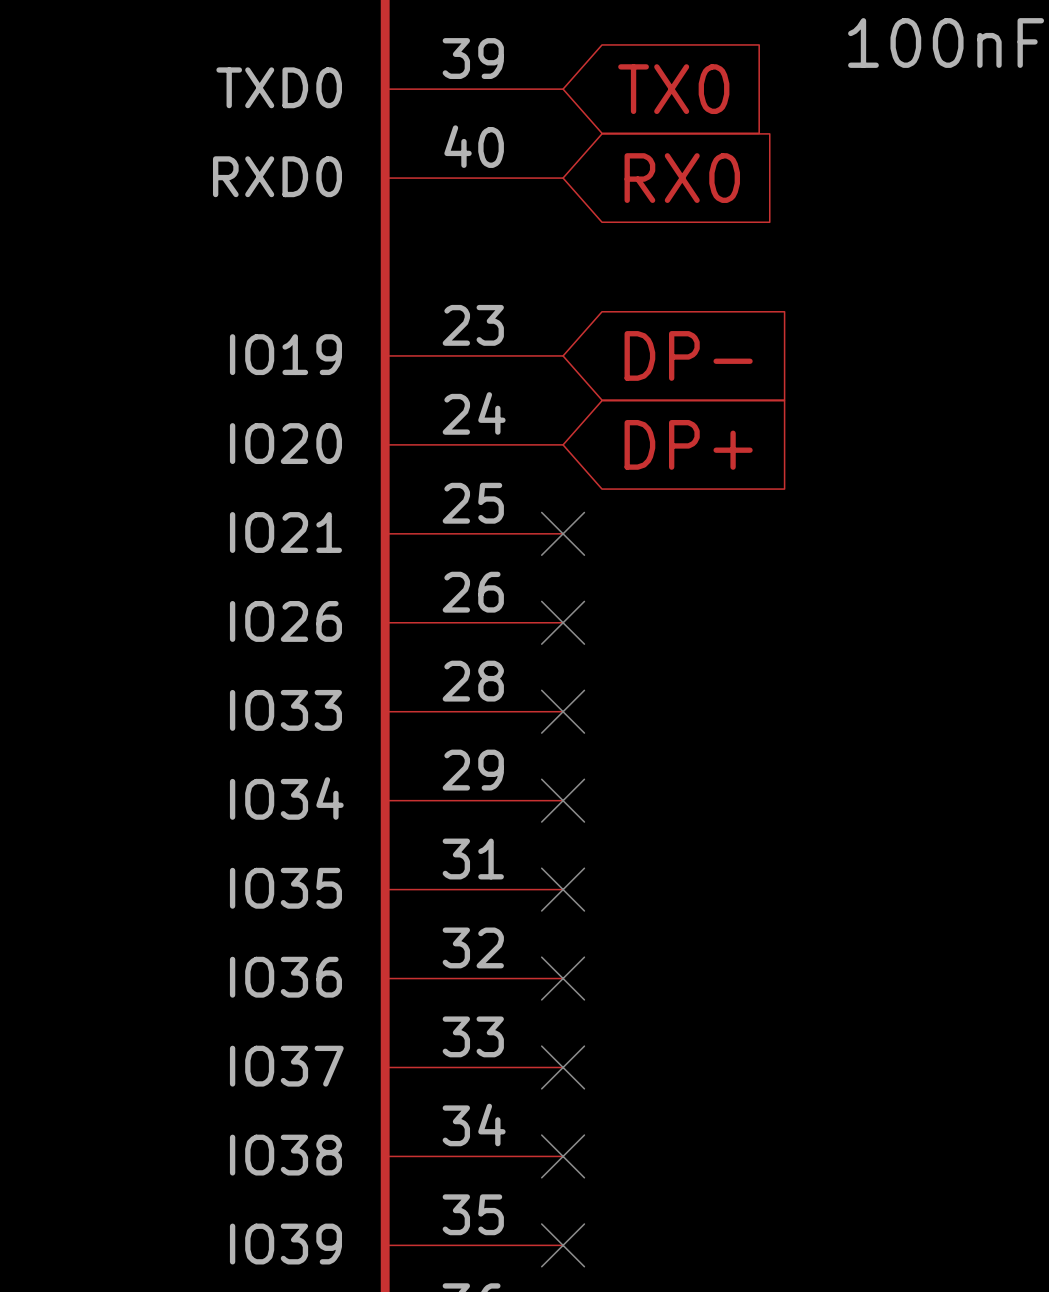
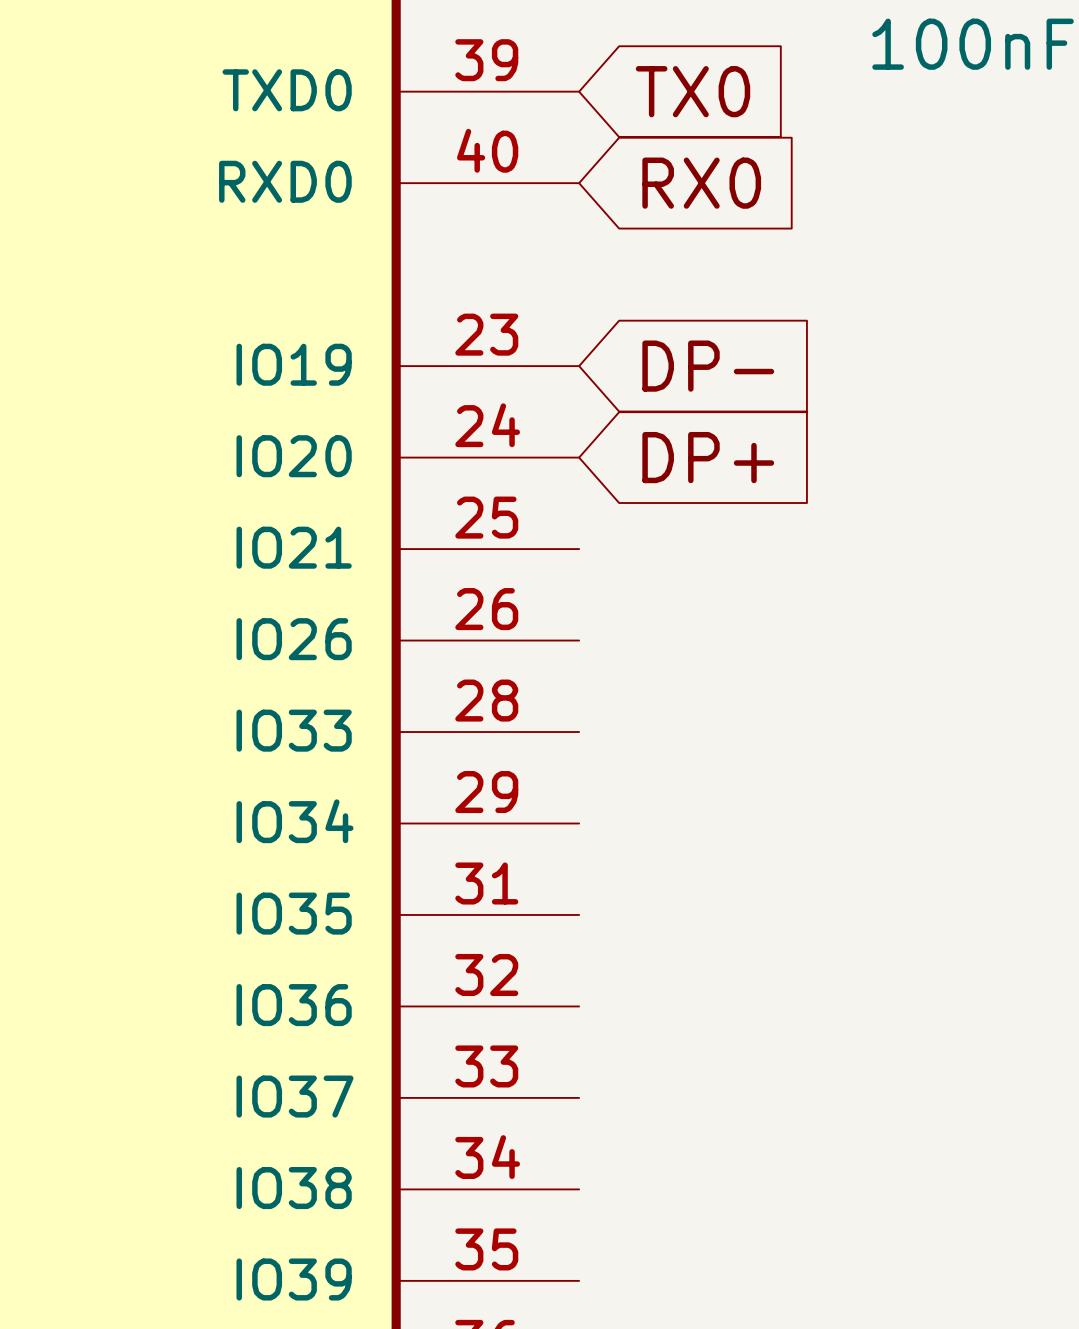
no-connect mark: (563, 533) -> none
no-connect mark: (563, 622) -> none
no-connect mark: (563, 711) -> none
no-connect mark: (563, 800) -> none
no-connect mark: (563, 889) -> none
no-connect mark: (563, 978) -> none
no-connect mark: (563, 1067) -> none
no-connect mark: (563, 1156) -> none
no-connect mark: (563, 1245) -> none

